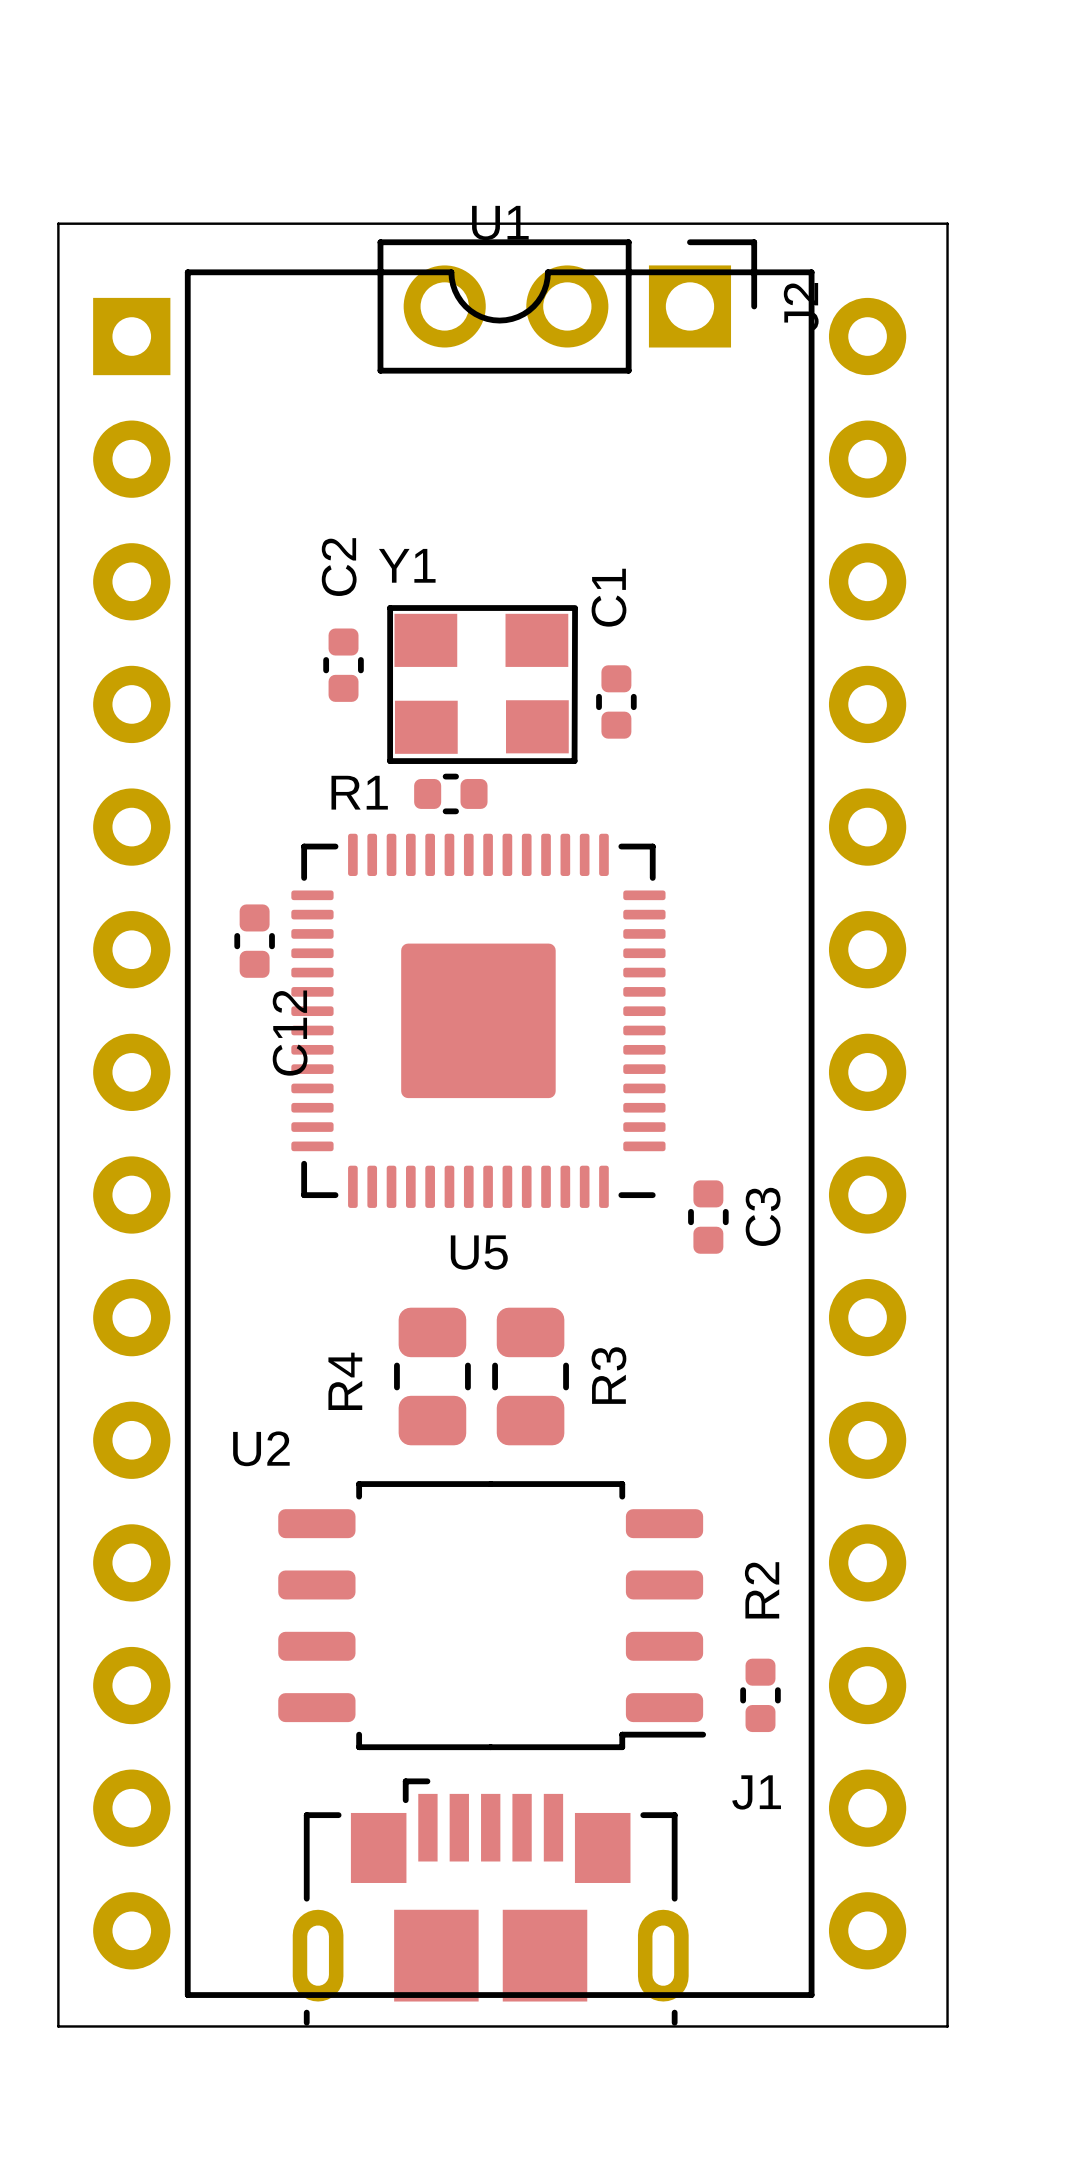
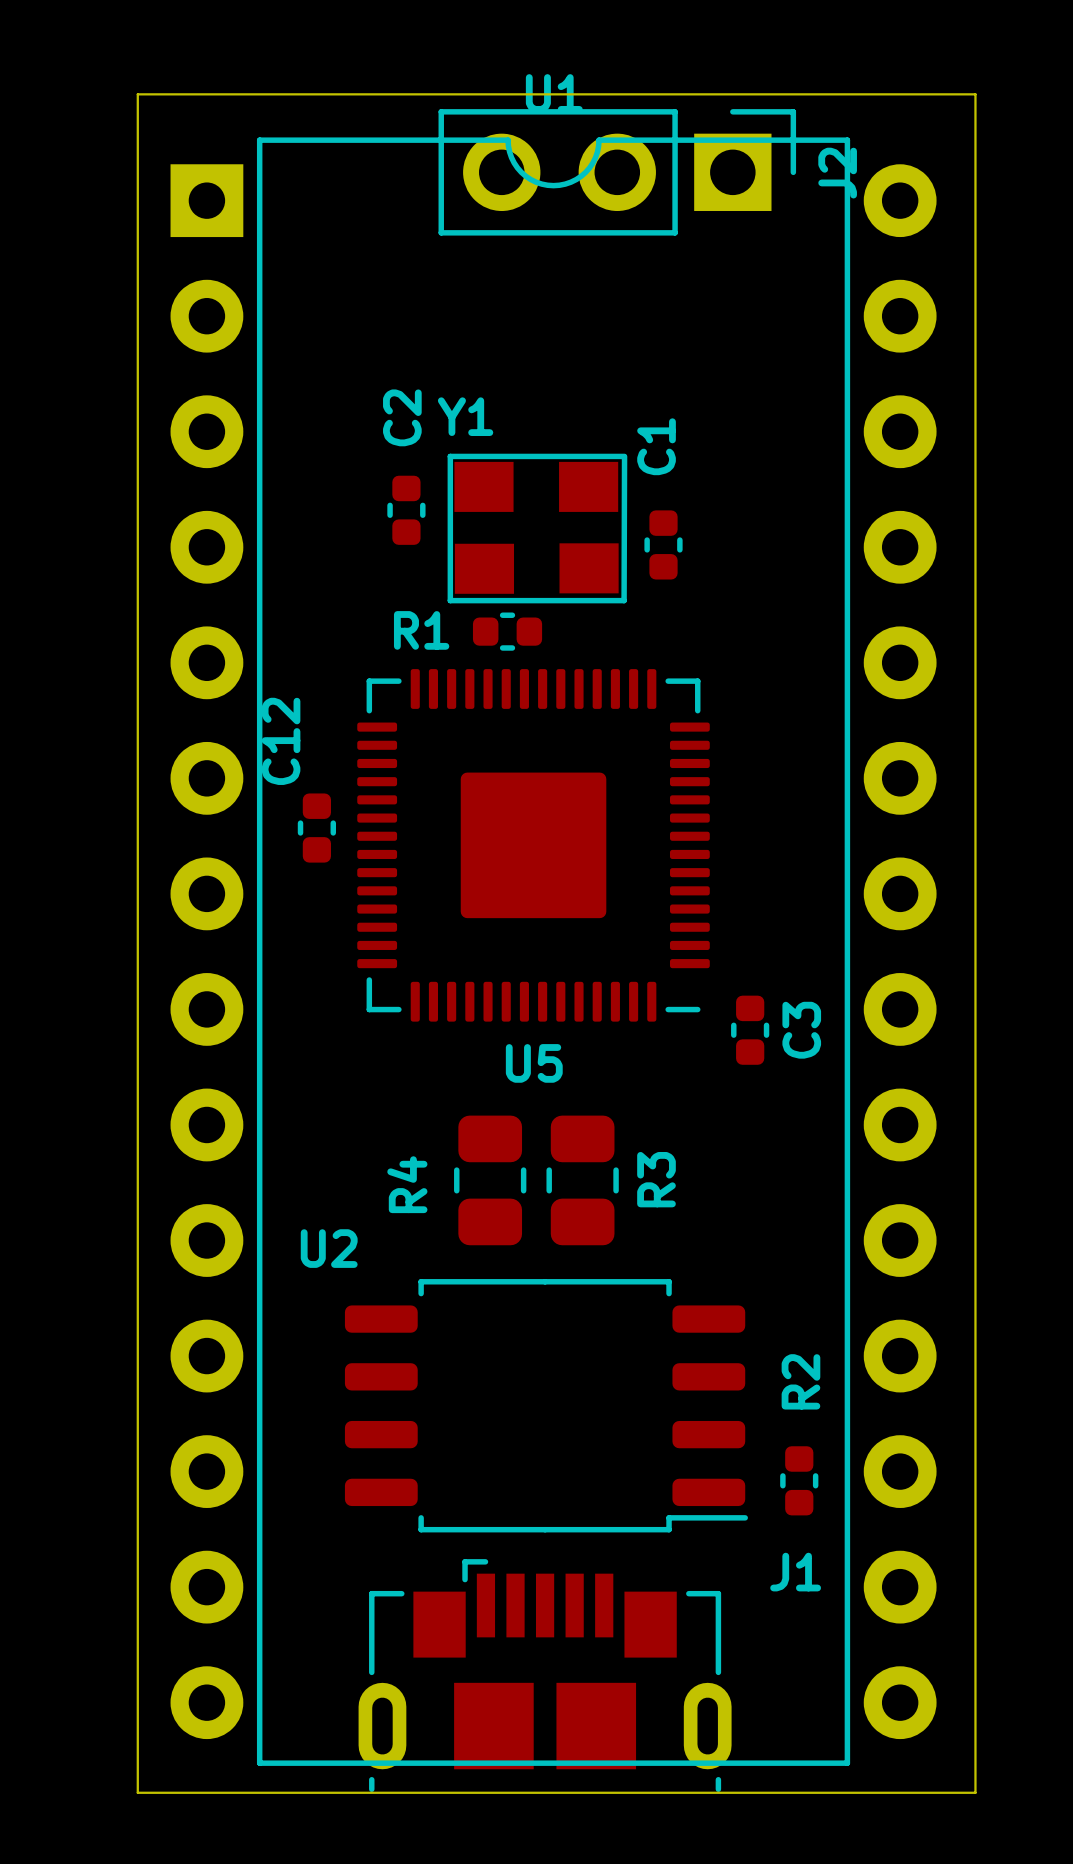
C12 position: (254, 941) -> (316, 828)
C12 name position: C12 (290, 1033) -> C12 (281, 741)

